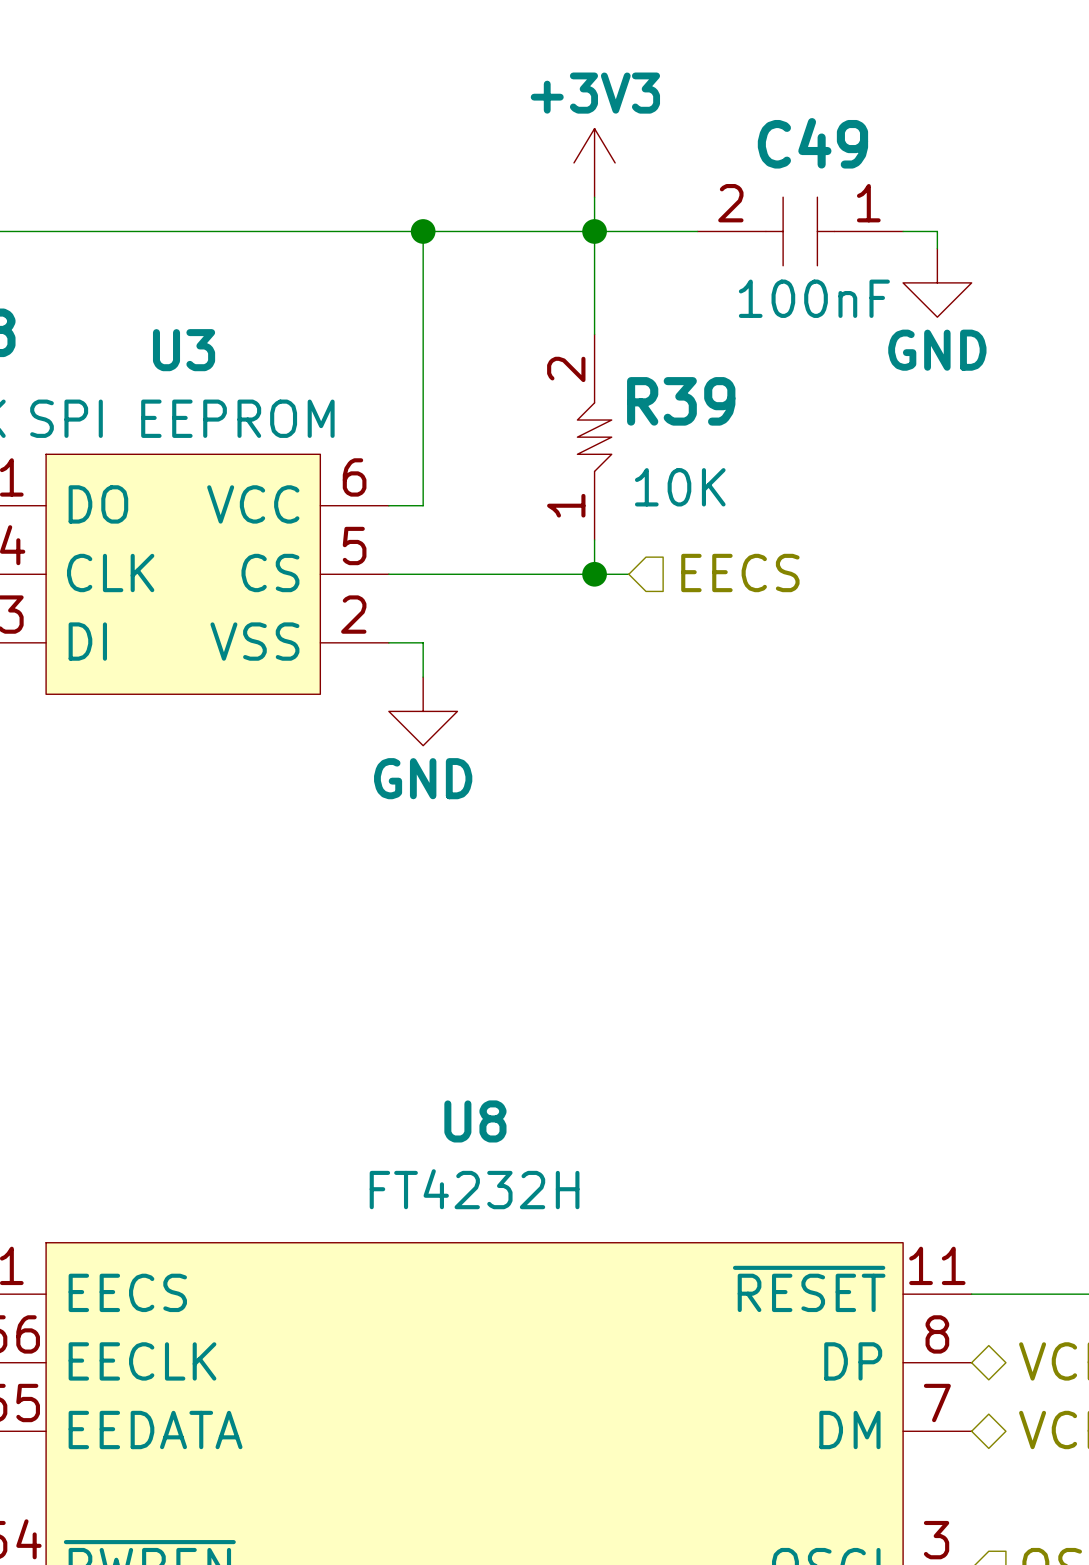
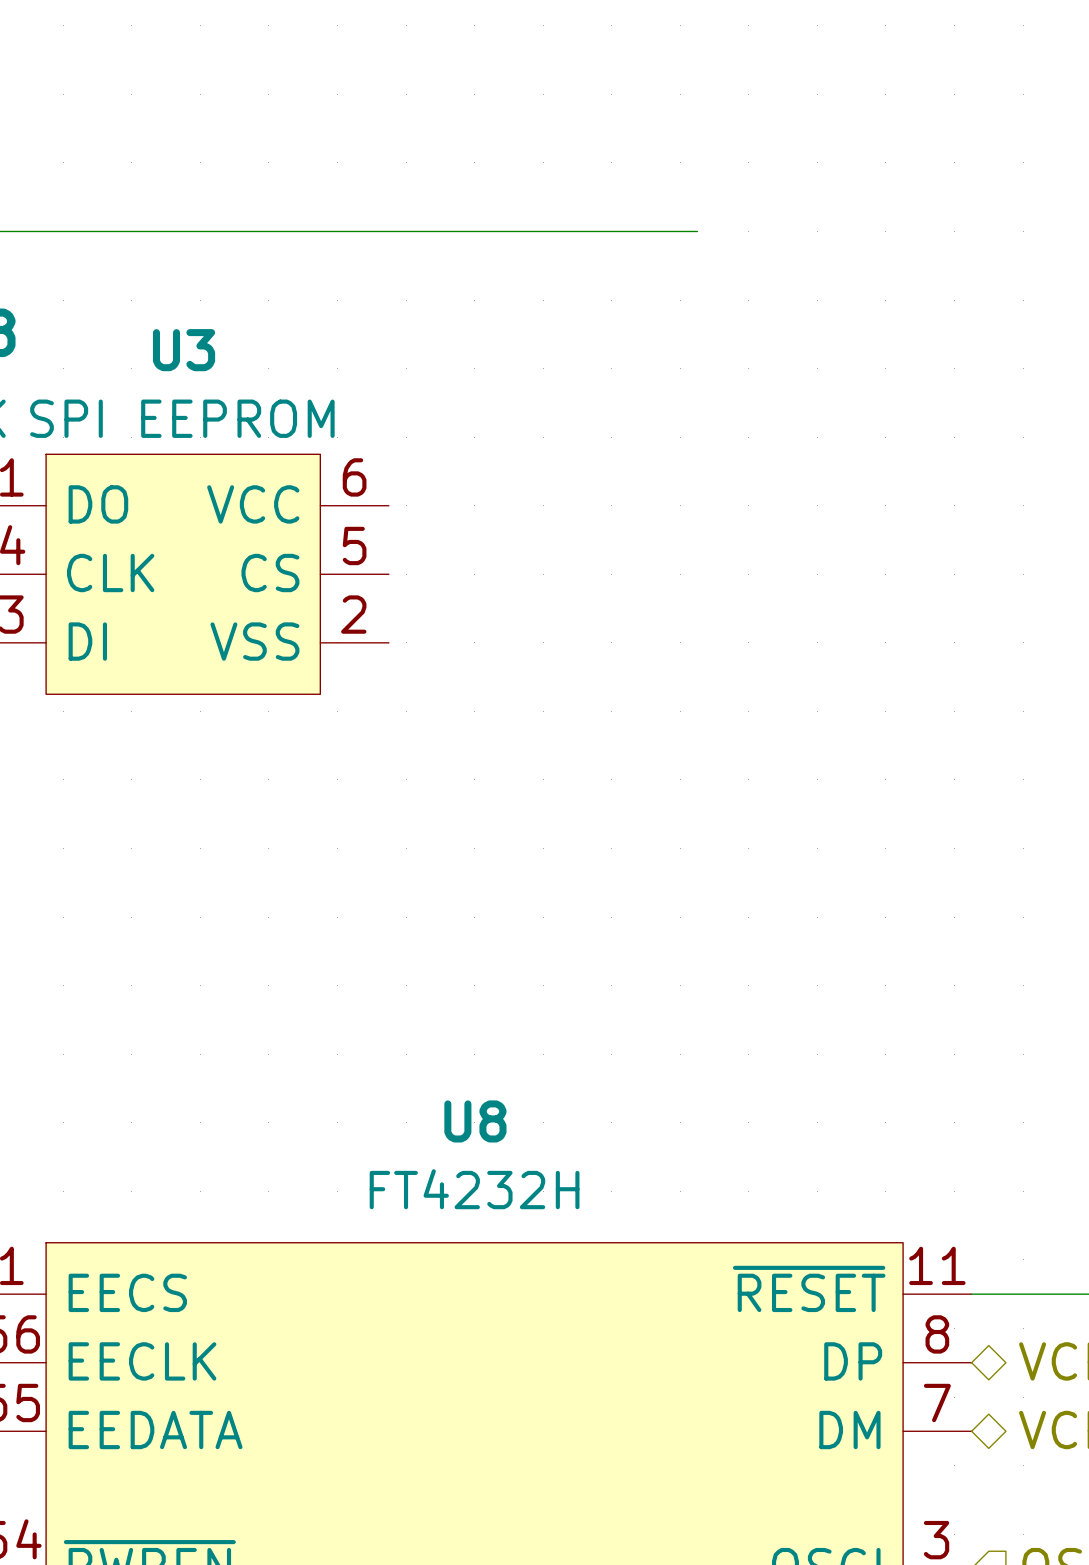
power symbol: +3V3 (594, 162) -> none
wire: (594, 197) (594, 334) -> none
wire: (423, 231) (423, 505) (388, 505) -> none
junction: (423, 231) -> none
junction: (594, 231) -> none
C49: 100nF (800, 231) -> none
wire: (903, 231) (937, 231) (937, 248) -> none
power symbol: GND (937, 282) -> none
R39: 10K (594, 437) -> none
wire: (594, 540) (594, 574) -> none
hierarchical label: EECS (740, 573) -> none
wire: (388, 574) (628, 574) -> none
junction: (594, 574) -> none
wire: (388, 642) (423, 642) (423, 677) -> none
power symbol: GND (423, 711) -> none

